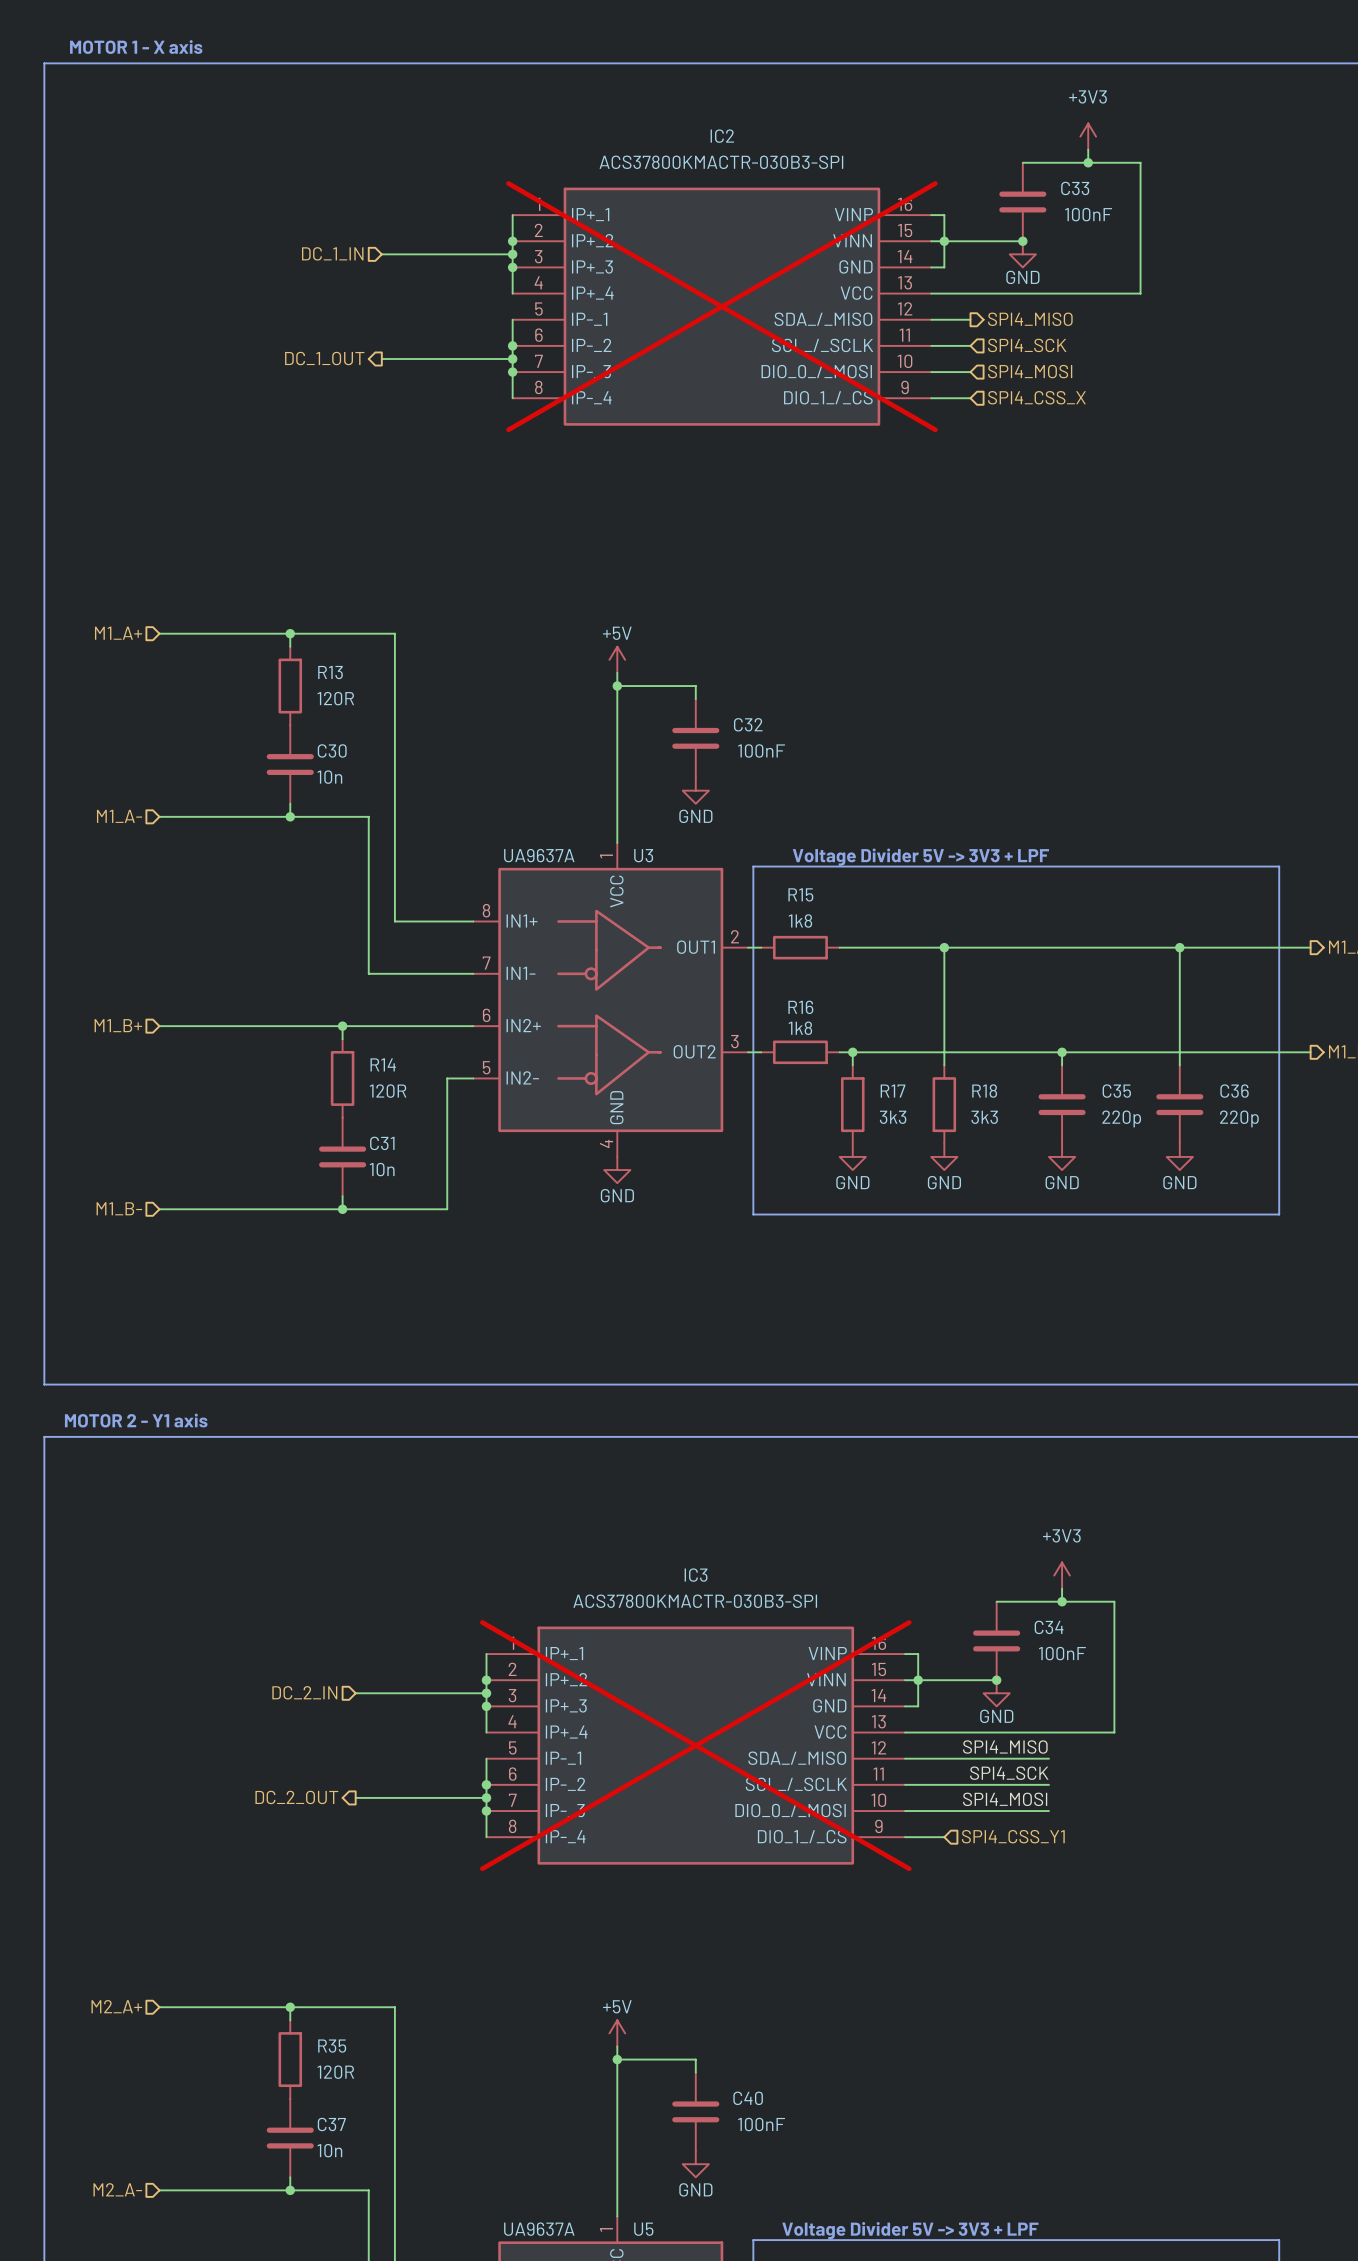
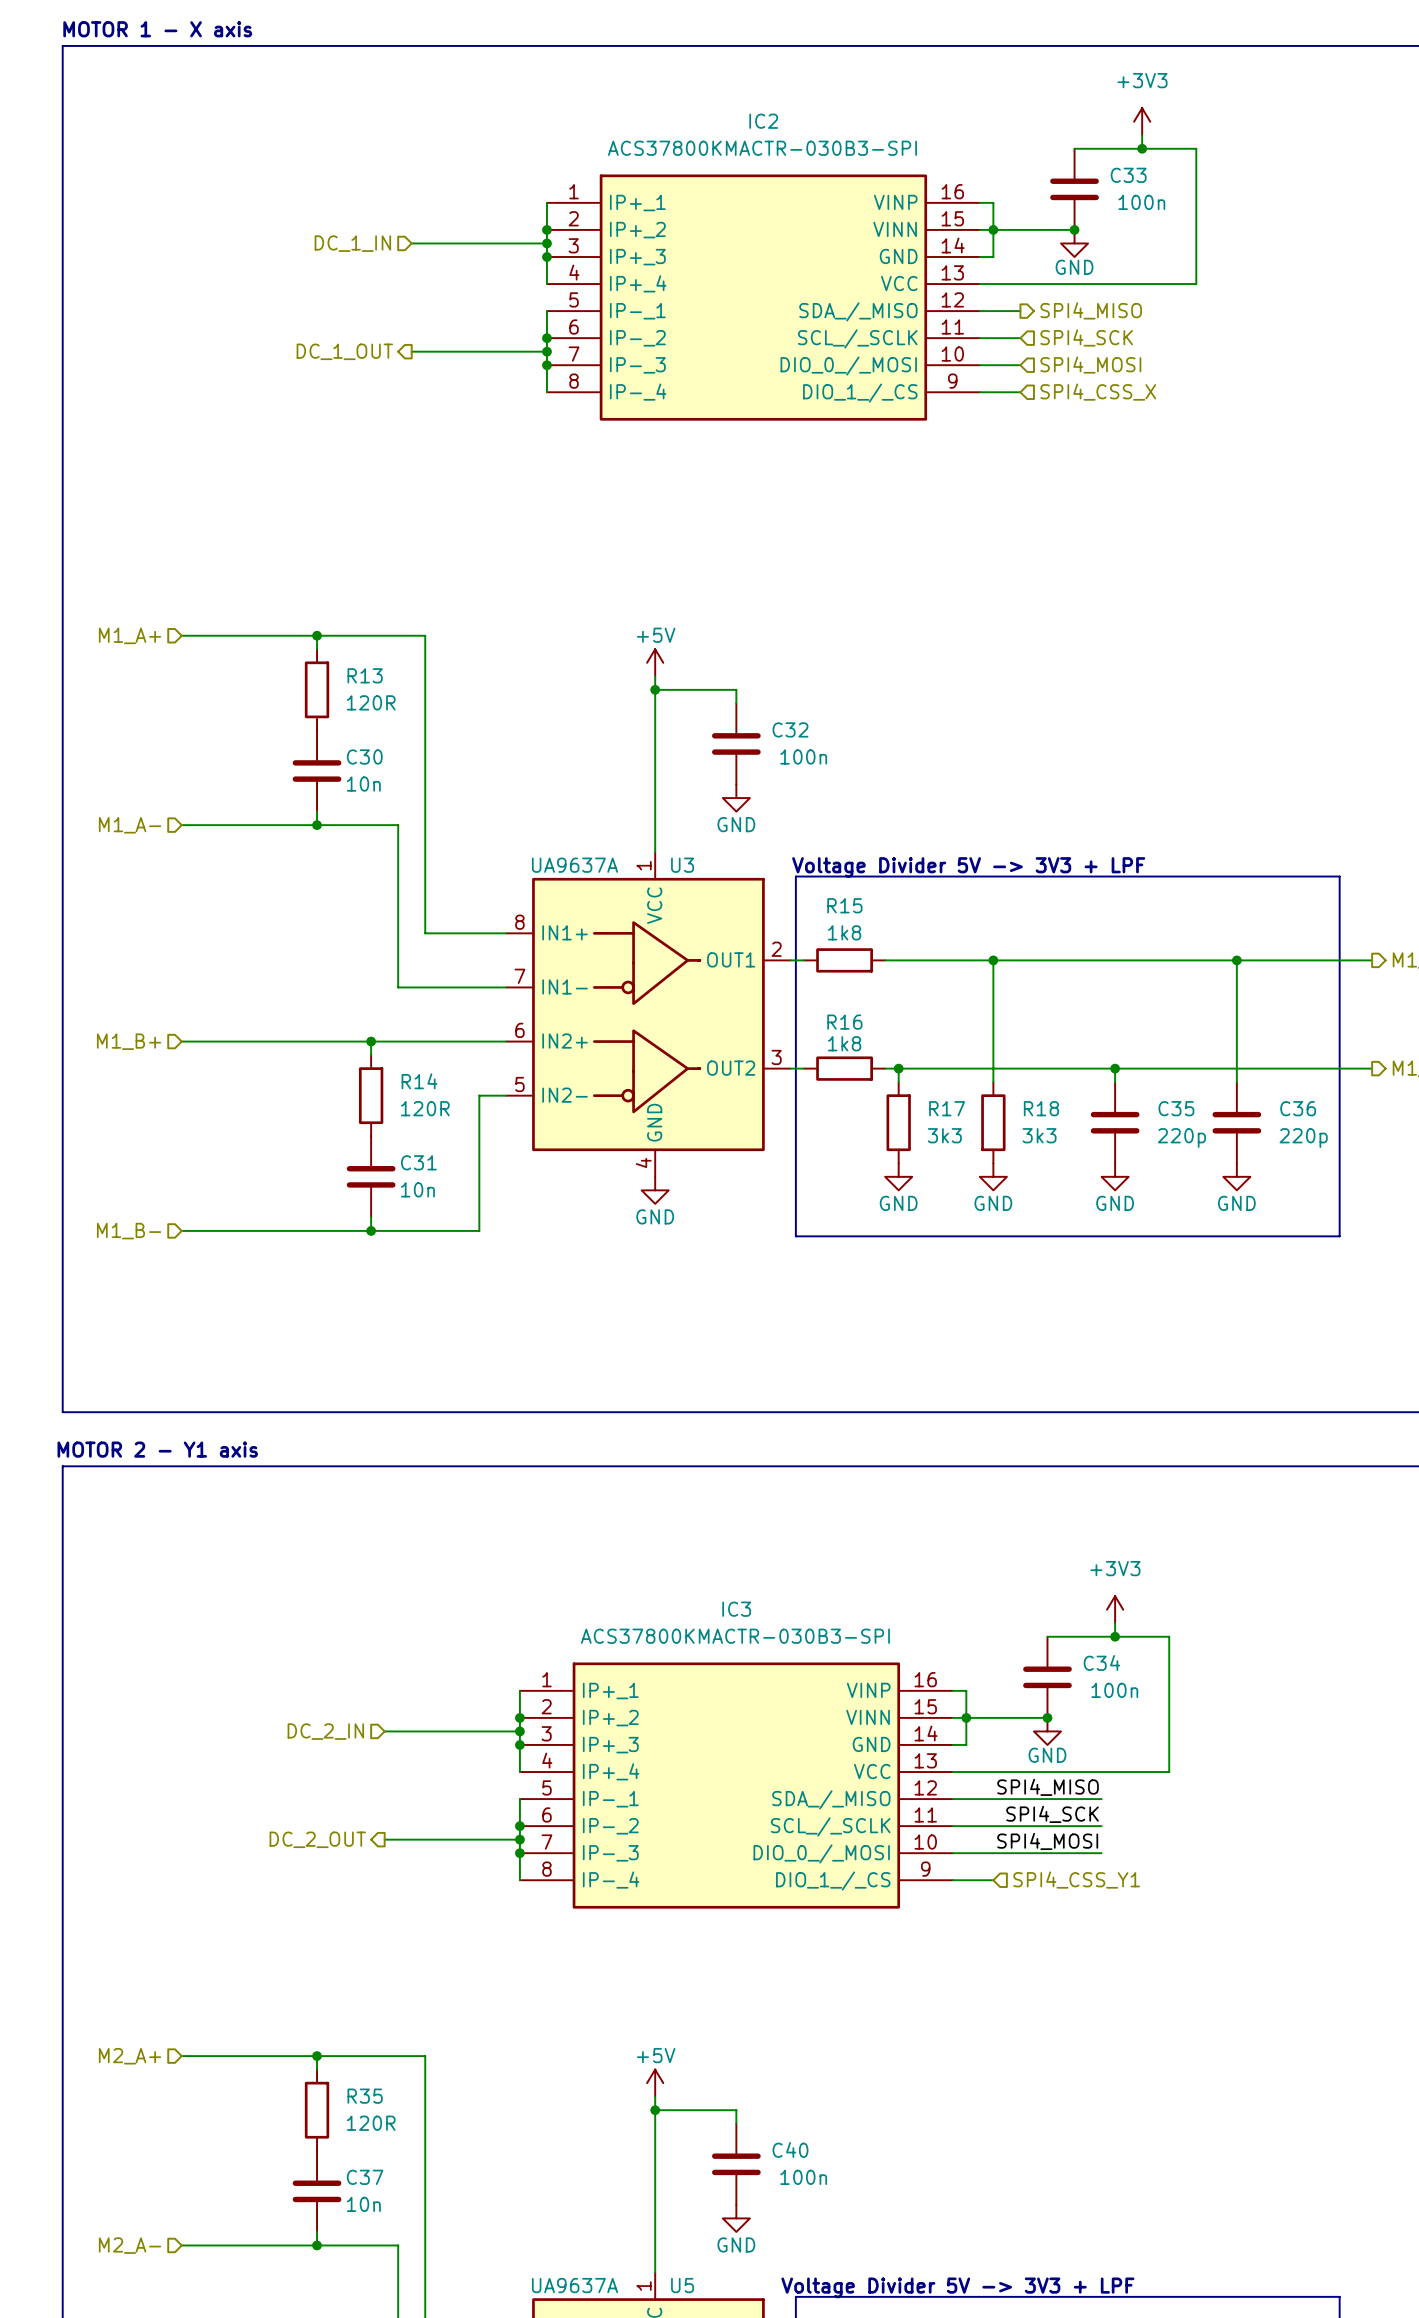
C33 value: 100nF (1088, 214) -> 100n (1141, 202)
IC2 do-not-place cross: (721, 306) -> none
C32 value: 100nF (761, 750) -> 100n (803, 756)
C34 value: 100nF (1062, 1653) -> 100n (1114, 1690)
IC3 do-not-place cross: (695, 1745) -> none
C40 value: 100nF (761, 2124) -> 100n (803, 2177)

